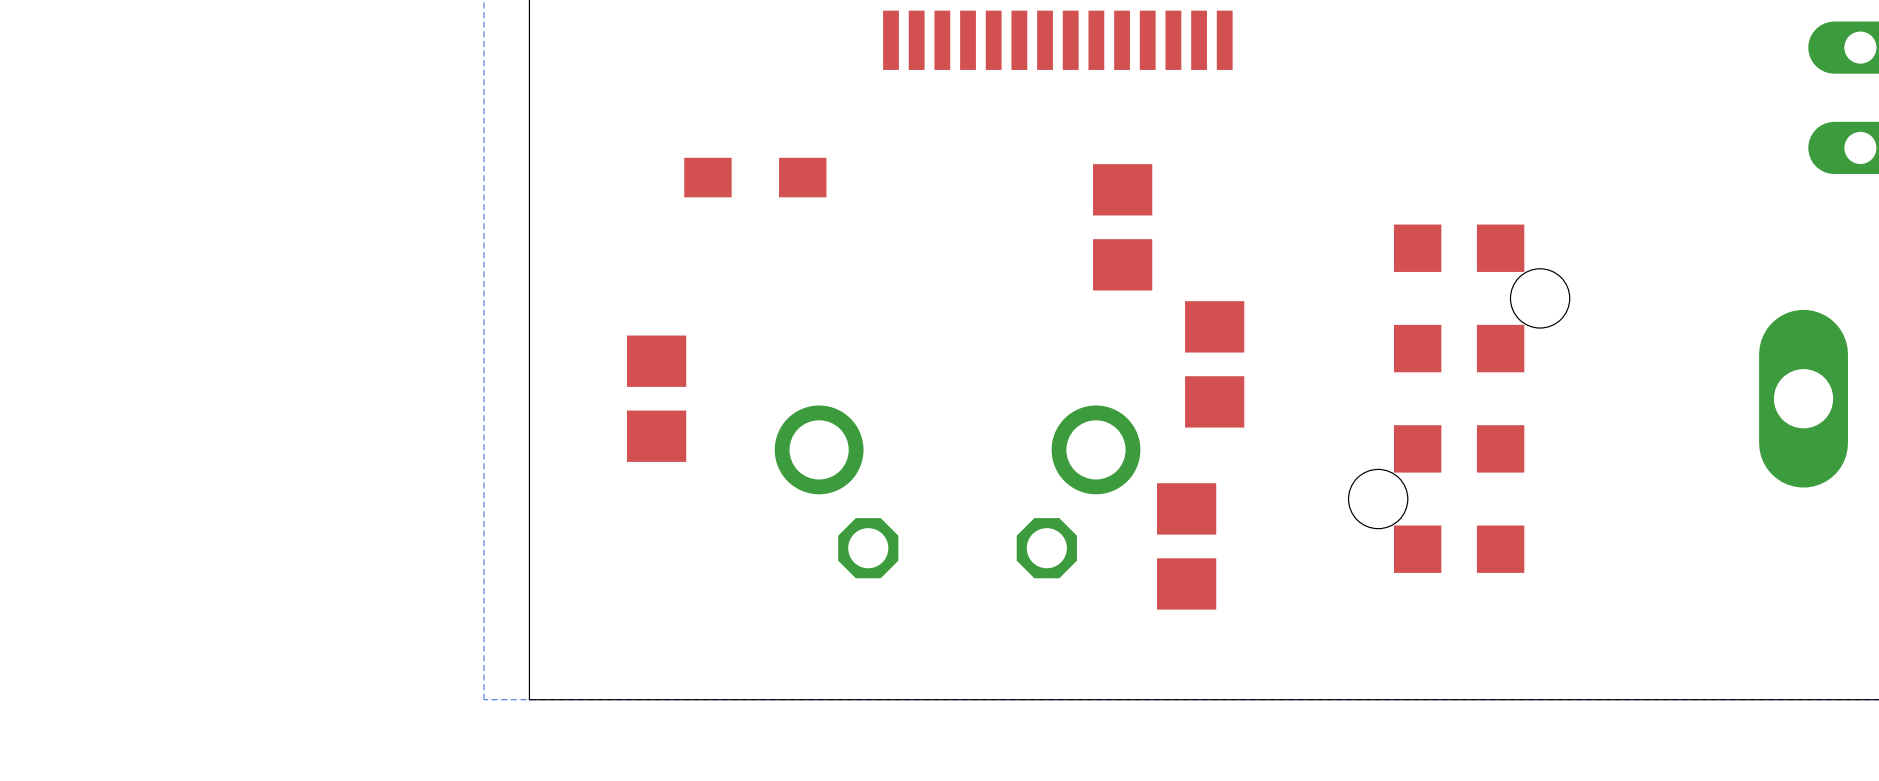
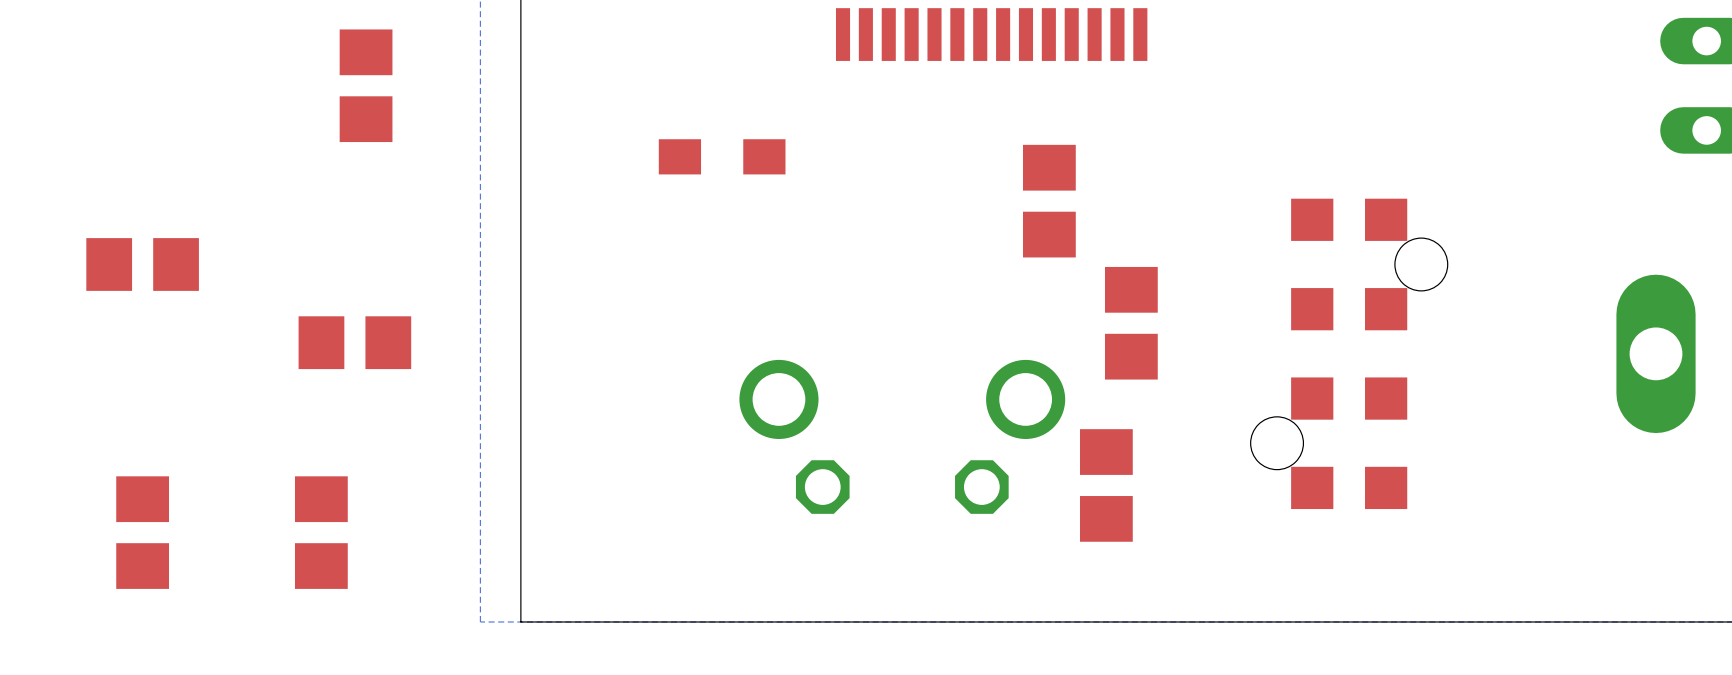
part: none -> (366, 85)
part: none -> (142, 264)
part: none -> (354, 342)
part: (656, 398) -> none
part: none -> (142, 532)
part: none -> (321, 532)

